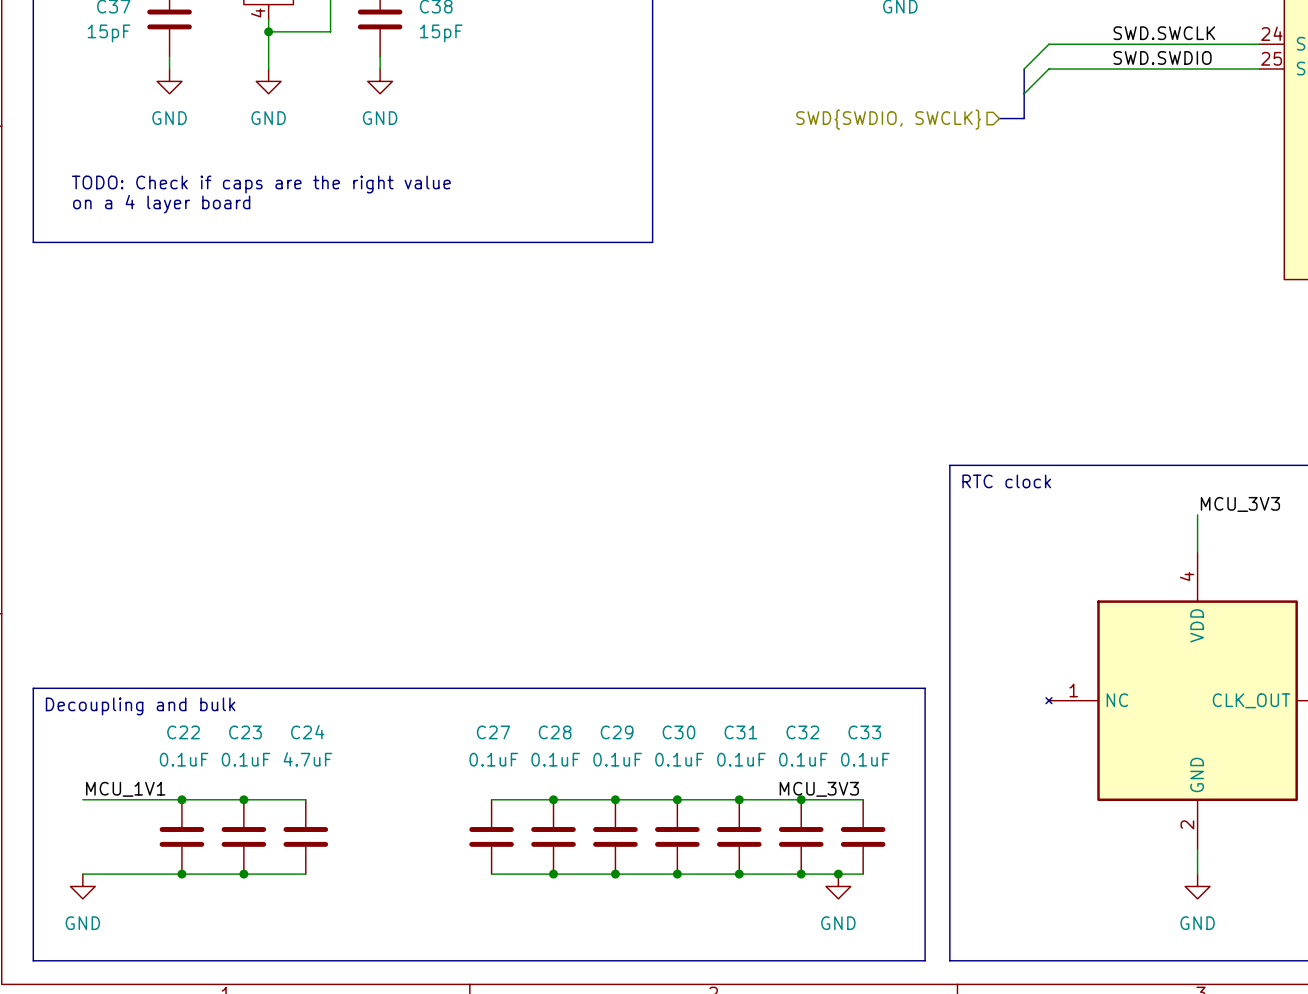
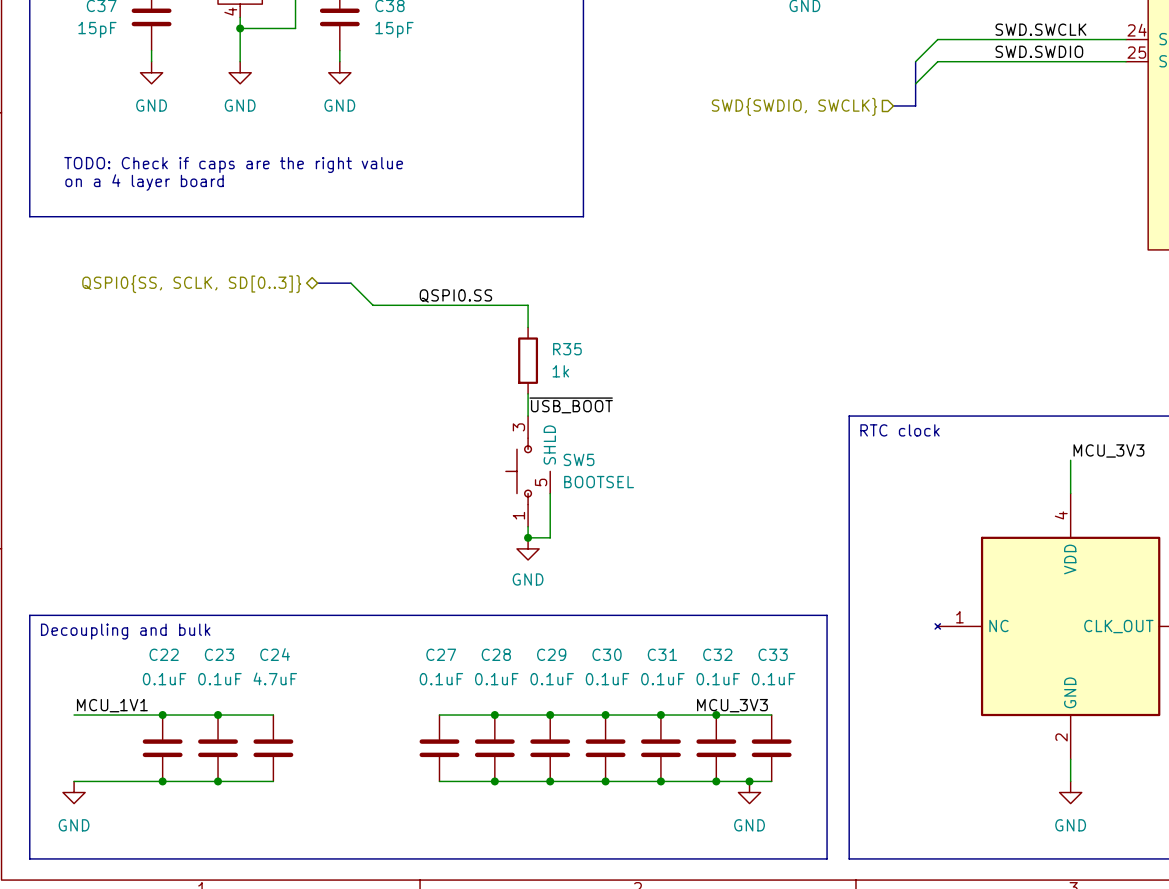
bus: none -> (317, 283) (350, 283)
wire: none -> (350, 283) (373, 305) (528, 305) (528, 327)
hierarchical label: none -> QSPI0{SS, SCLK, SD[0..3]} (191, 284)
label: none -> QSPI0.SS (455, 295)
R35: none -> 1k (528, 360)
wire: none -> (528, 393) (528, 416)
label: none -> ~{USB_BOOT} (571, 405)
SW5: none -> BOOTSEL (528, 471)
wire: none -> (550, 493) (550, 537) (528, 537) (528, 526)
junction: none -> (528, 537)
power symbol: none -> GND (528, 548)

